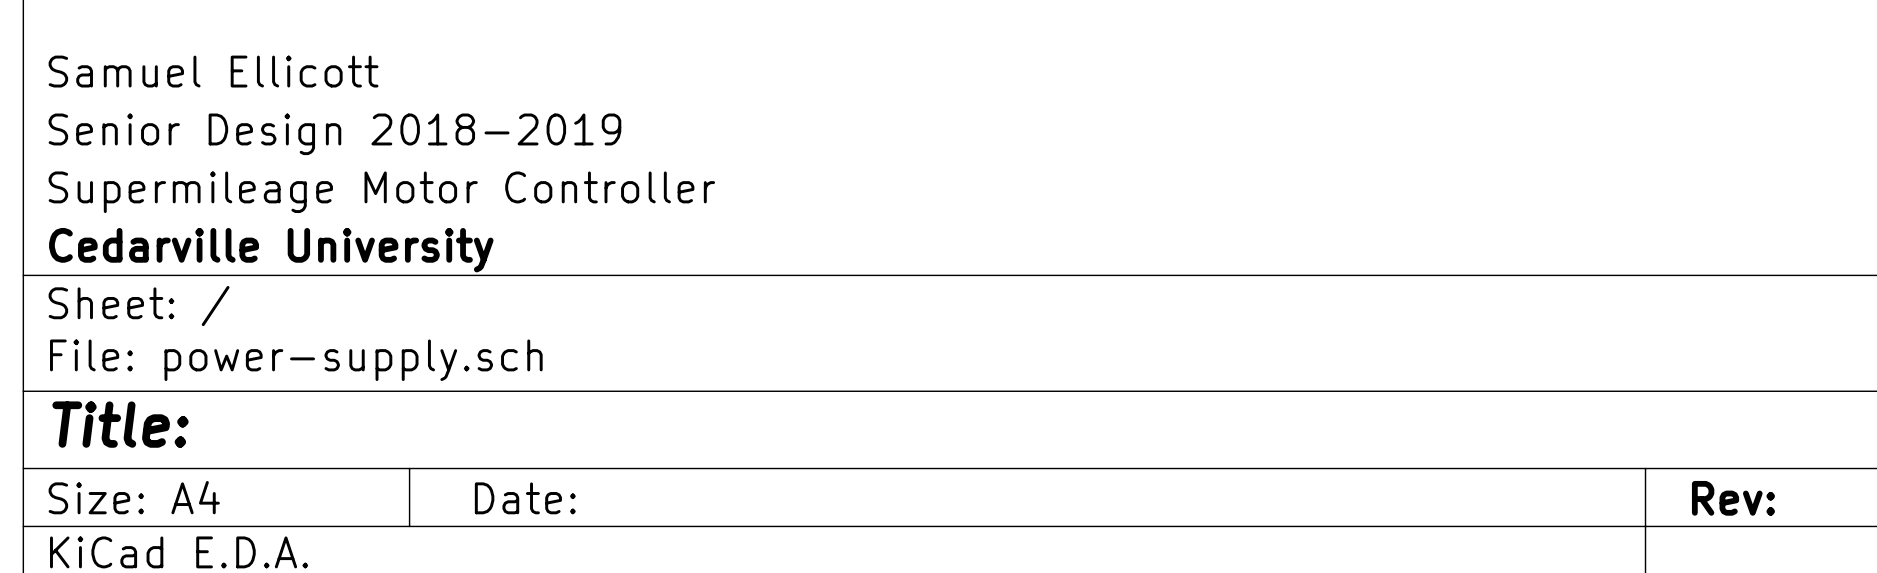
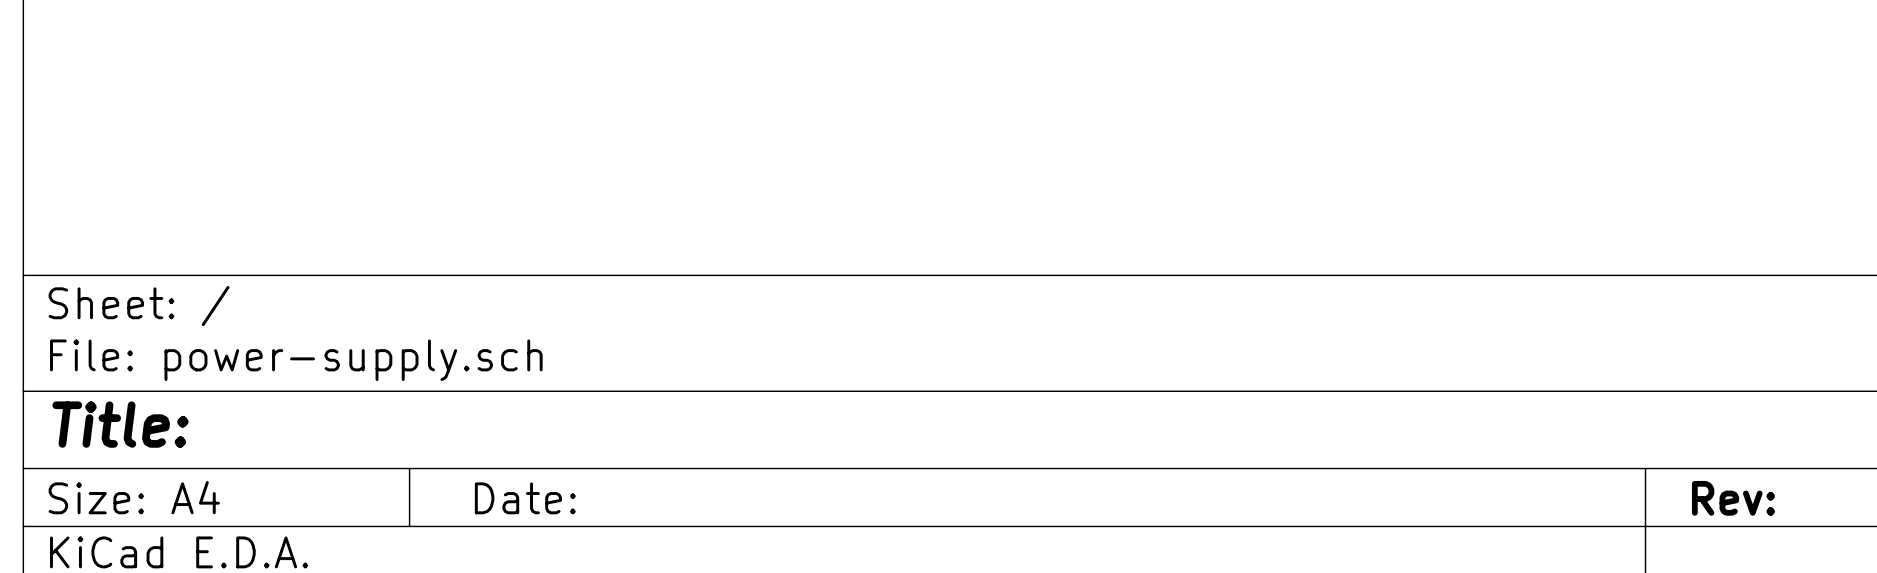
title block: Samuel Ellicott (213, 71) -> none
title block: Senior Design 2018-2019 (334, 134) -> none
title block: Supermileage Motor Controller (381, 192) -> none
title block: Cedarville University (271, 250) -> none

